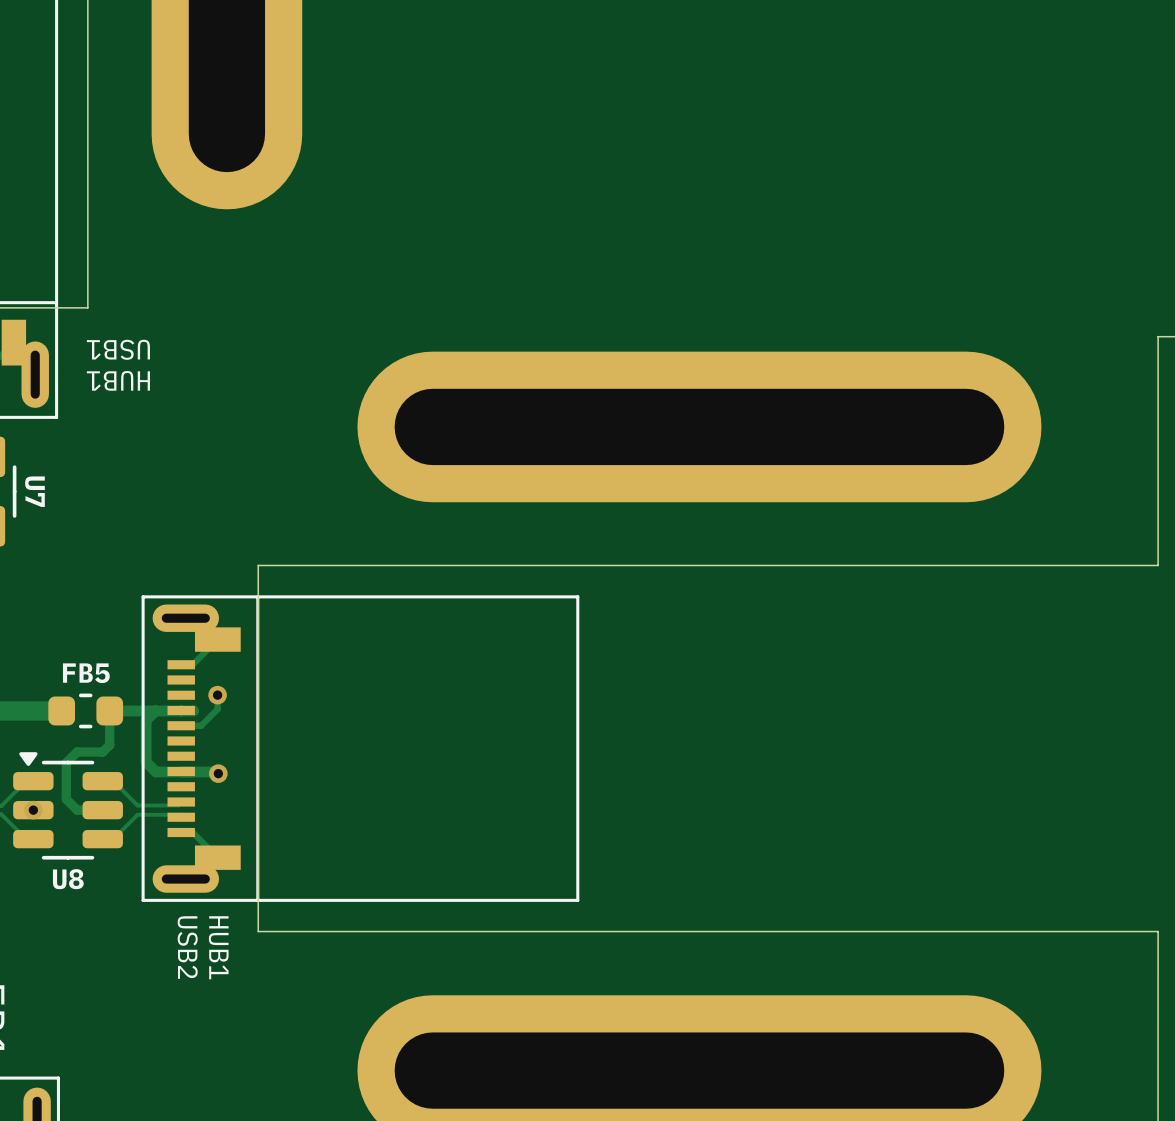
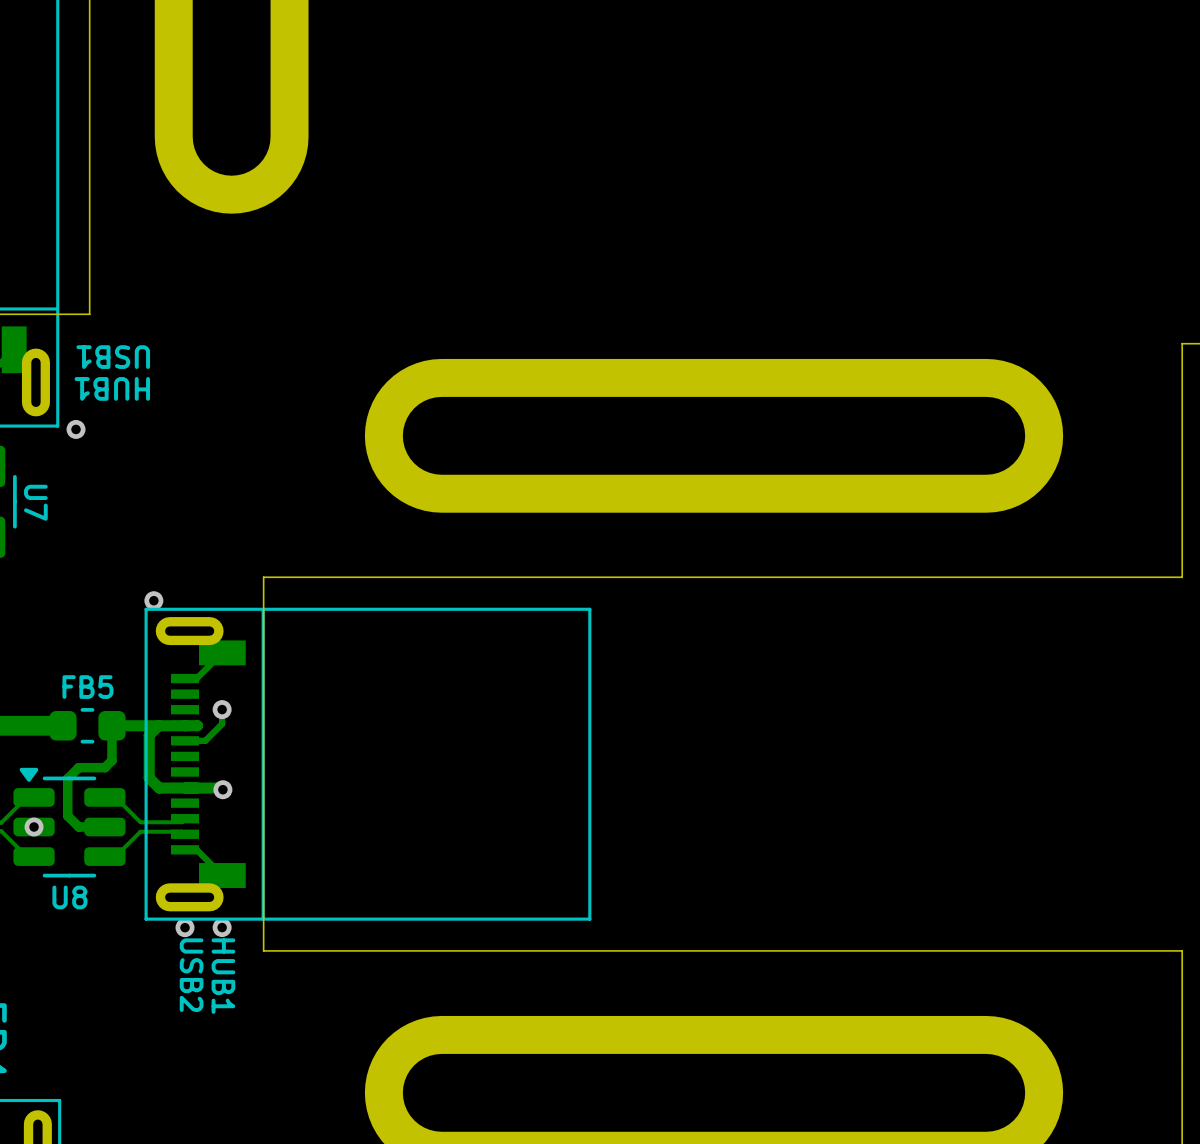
via: none -> (76, 429)
via: none -> (153, 600)
via: none -> (185, 927)
via: none -> (222, 927)

